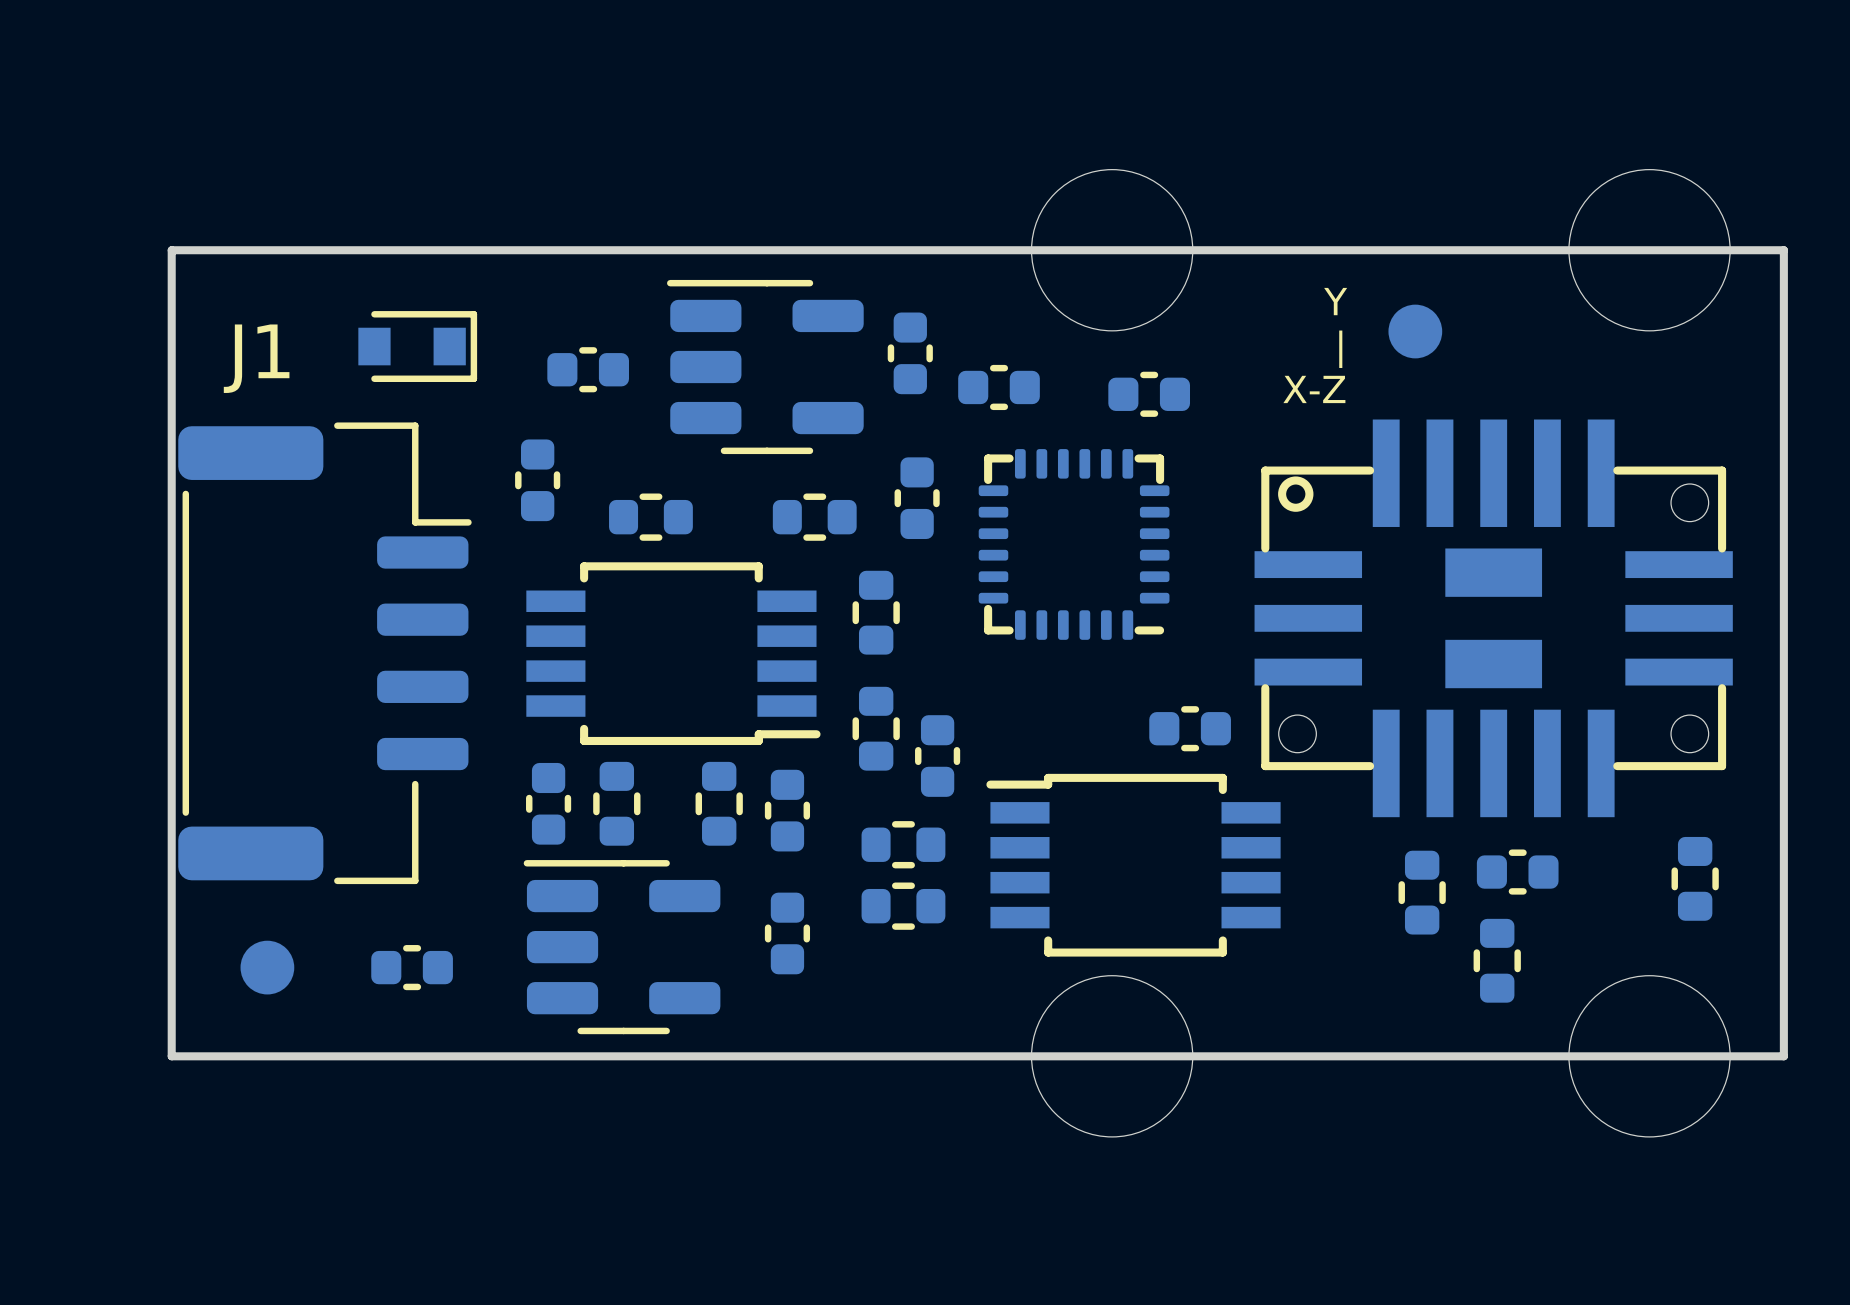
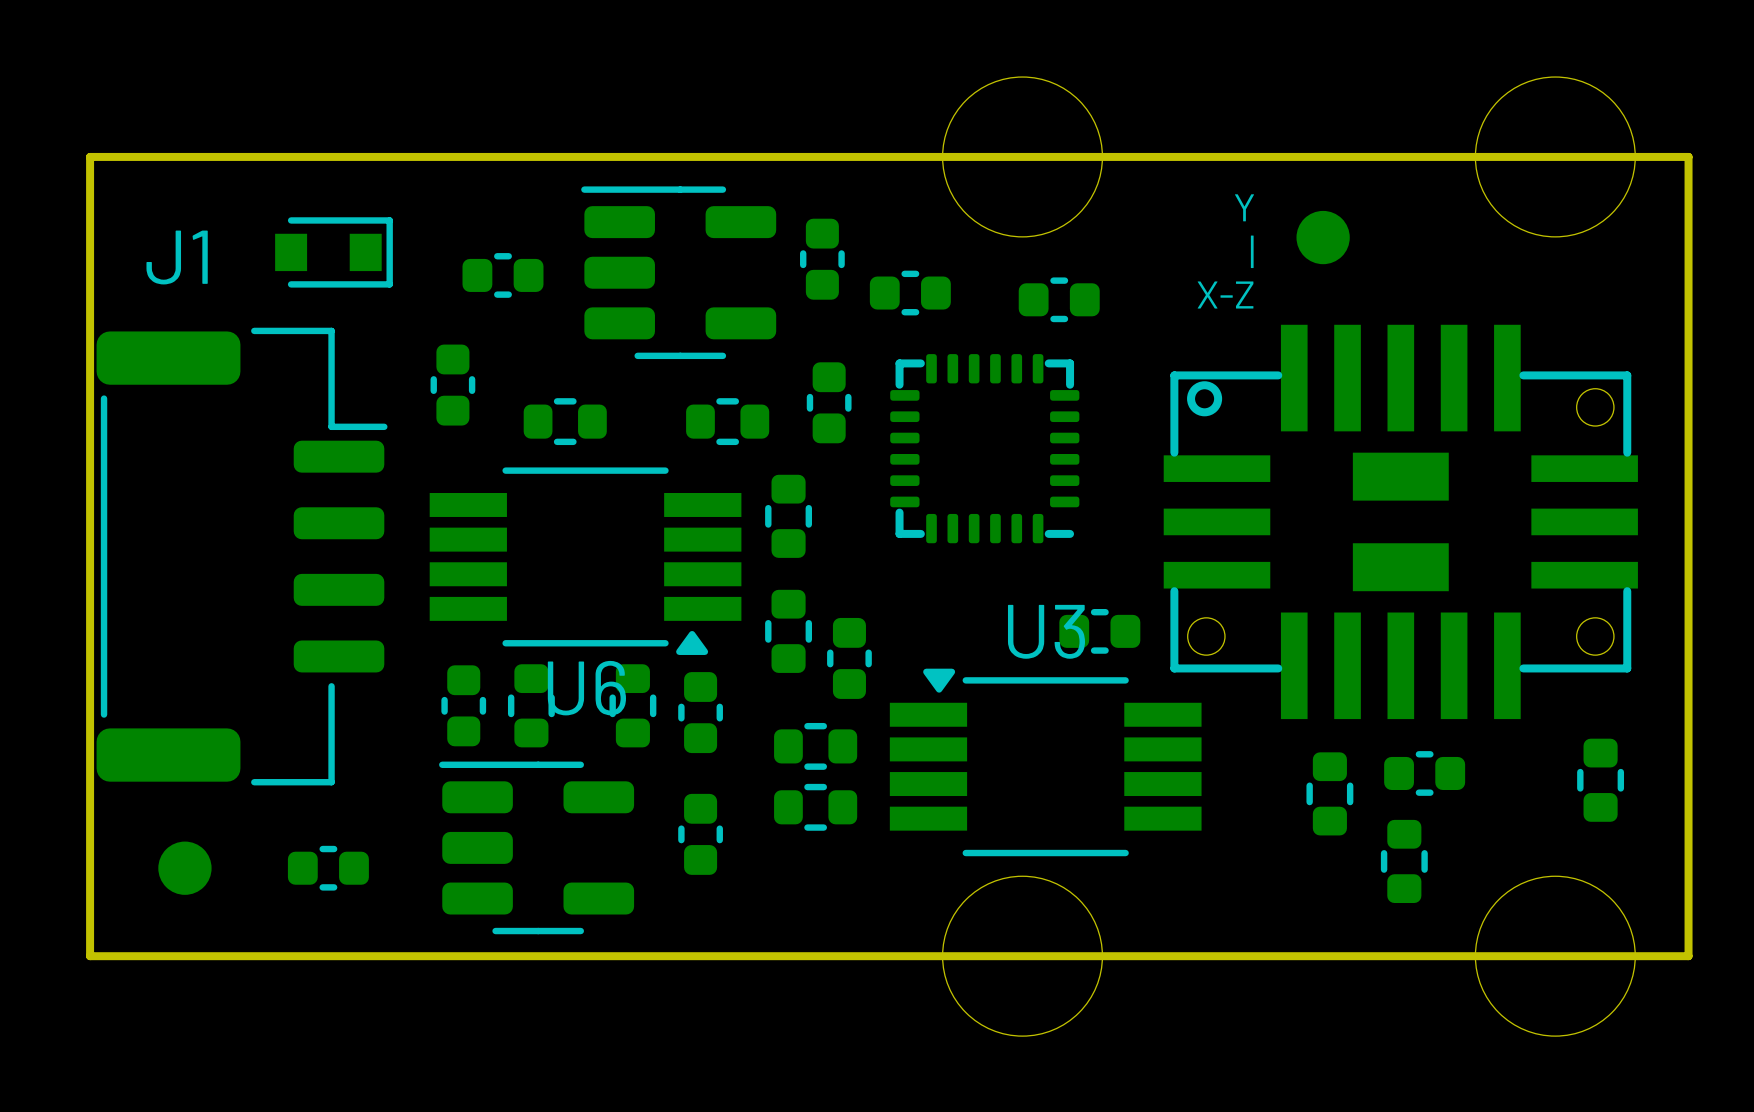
part: (673, 653) -> none
U6: none -> (585, 561)
U3: none -> (1045, 762)
part: (1133, 865) -> none

